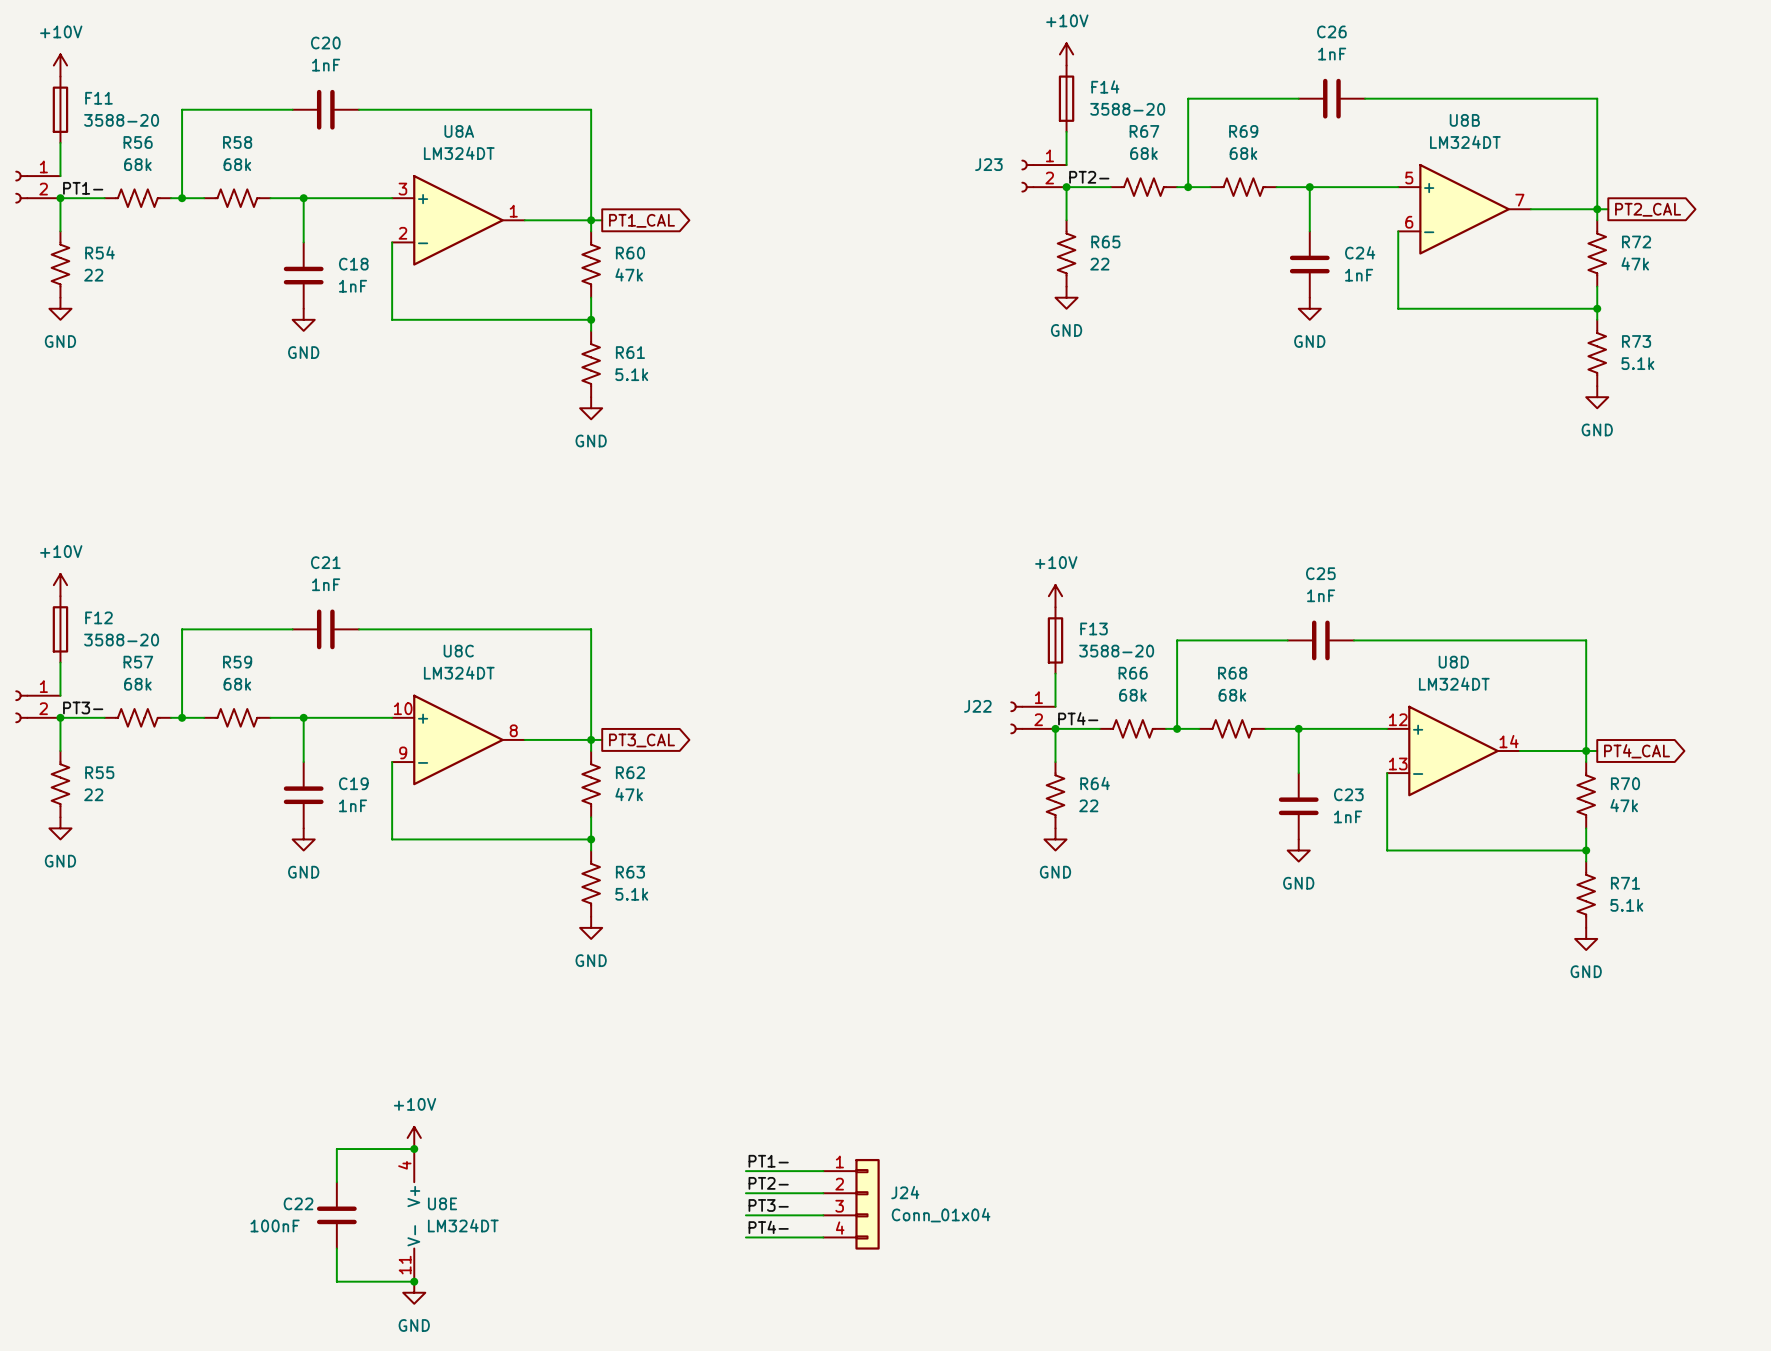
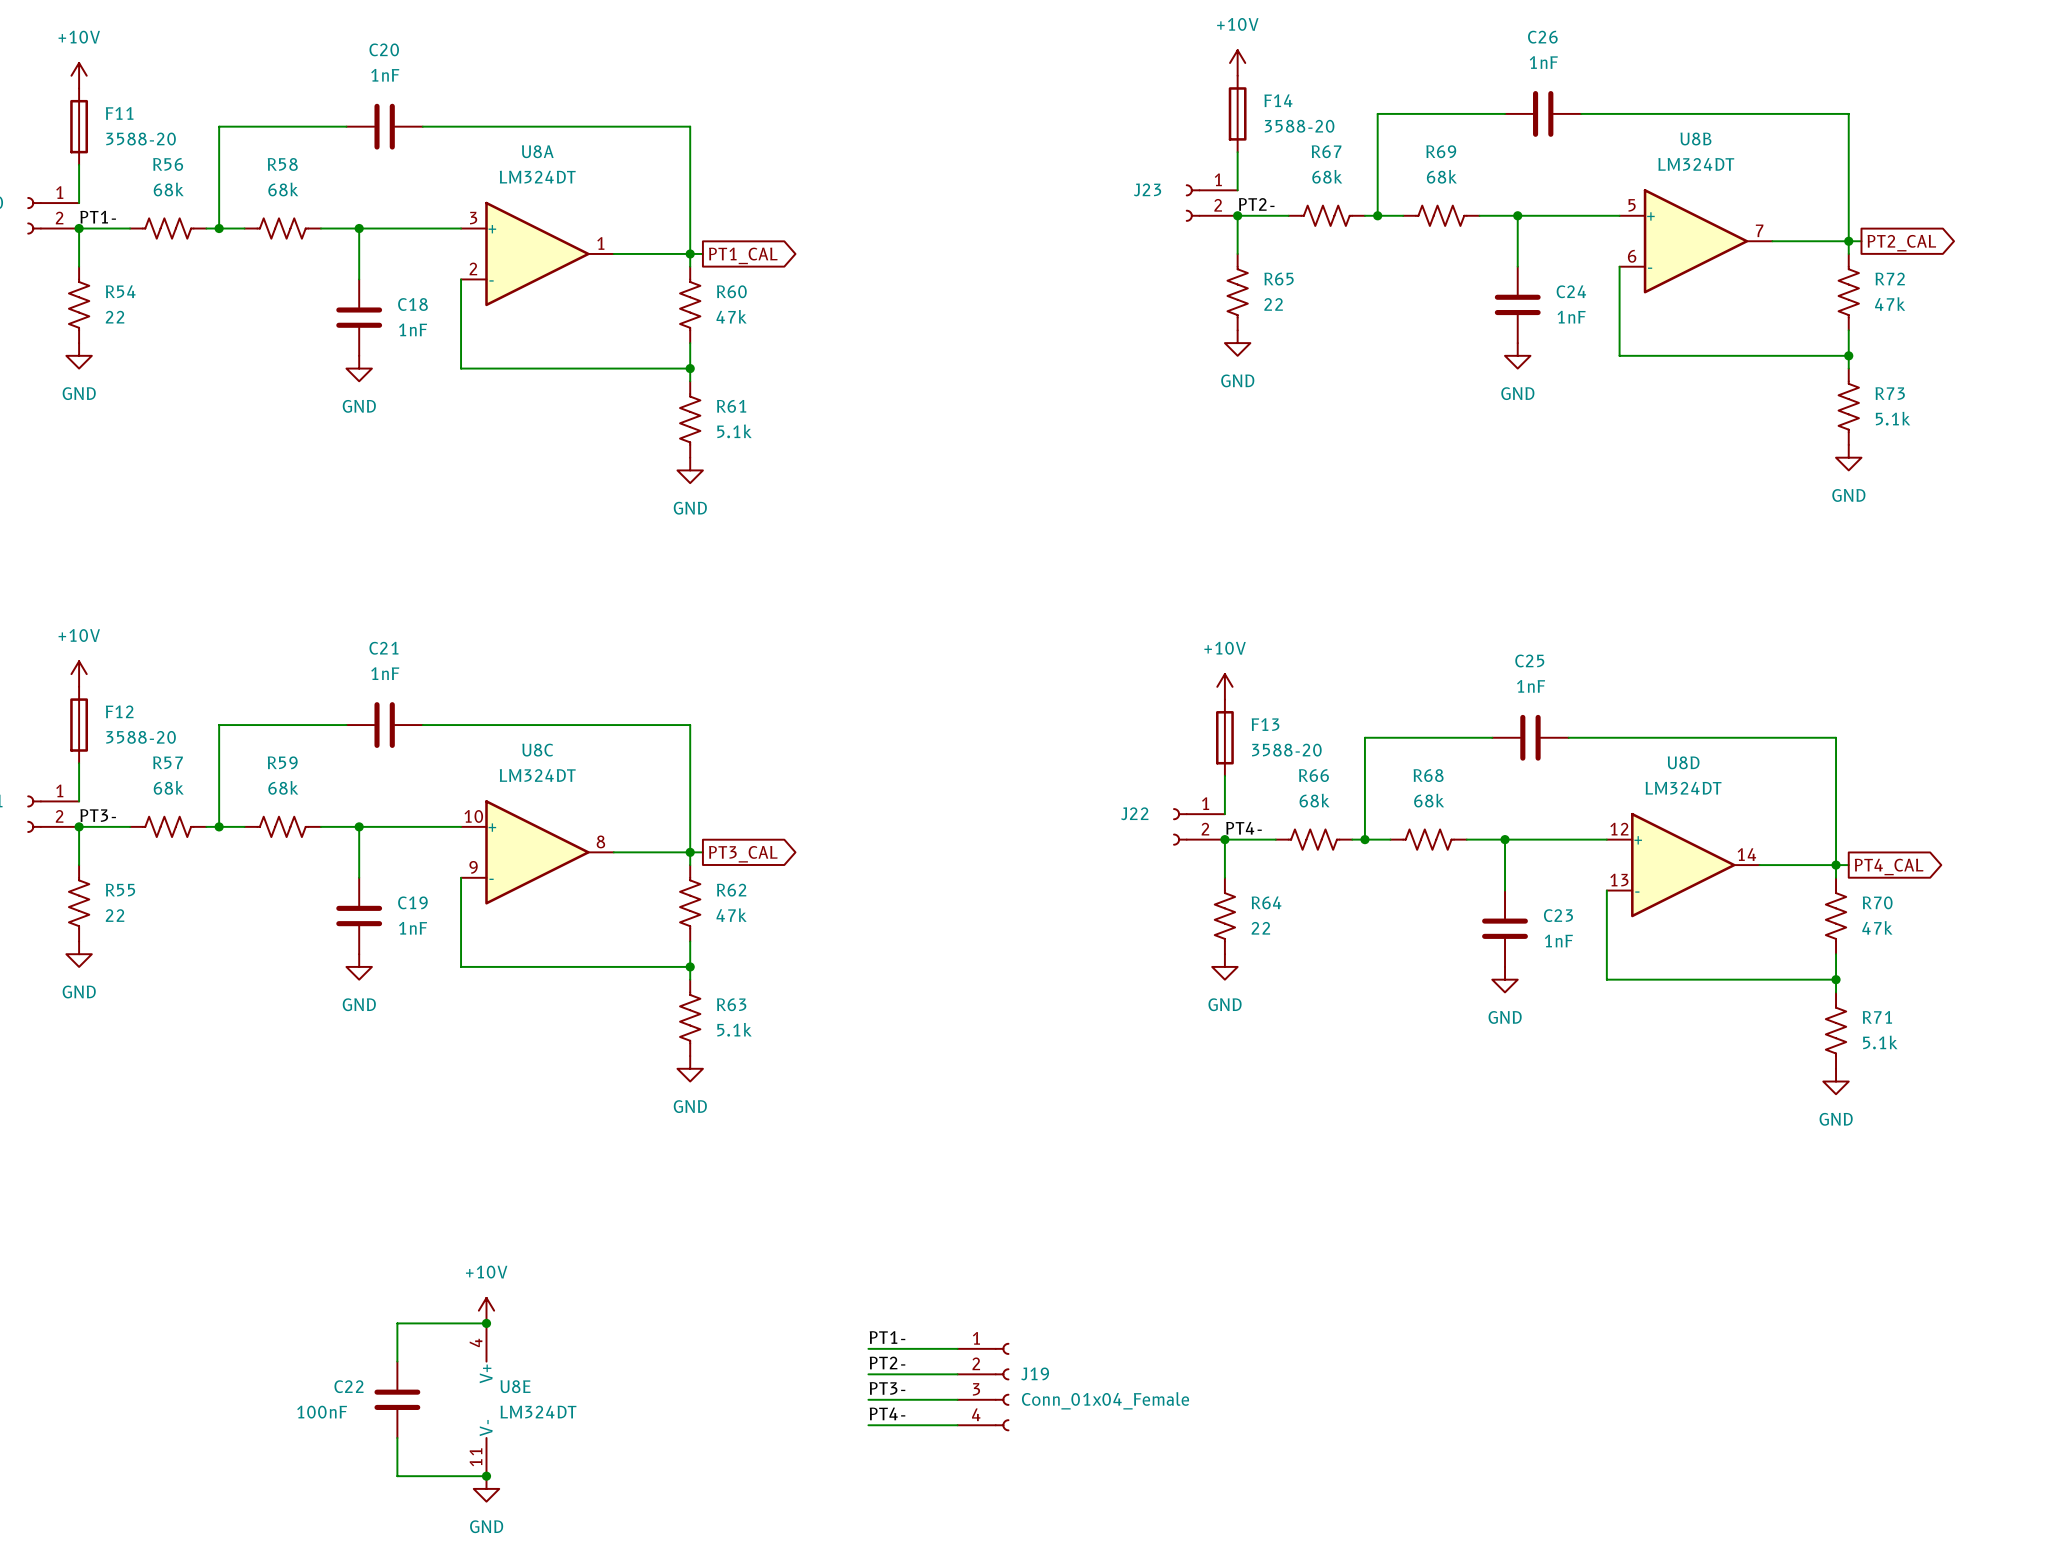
J19: none -> Conn_01x04_Female (983, 1387)
J24: Conn_01x04 (851, 1204) -> none

